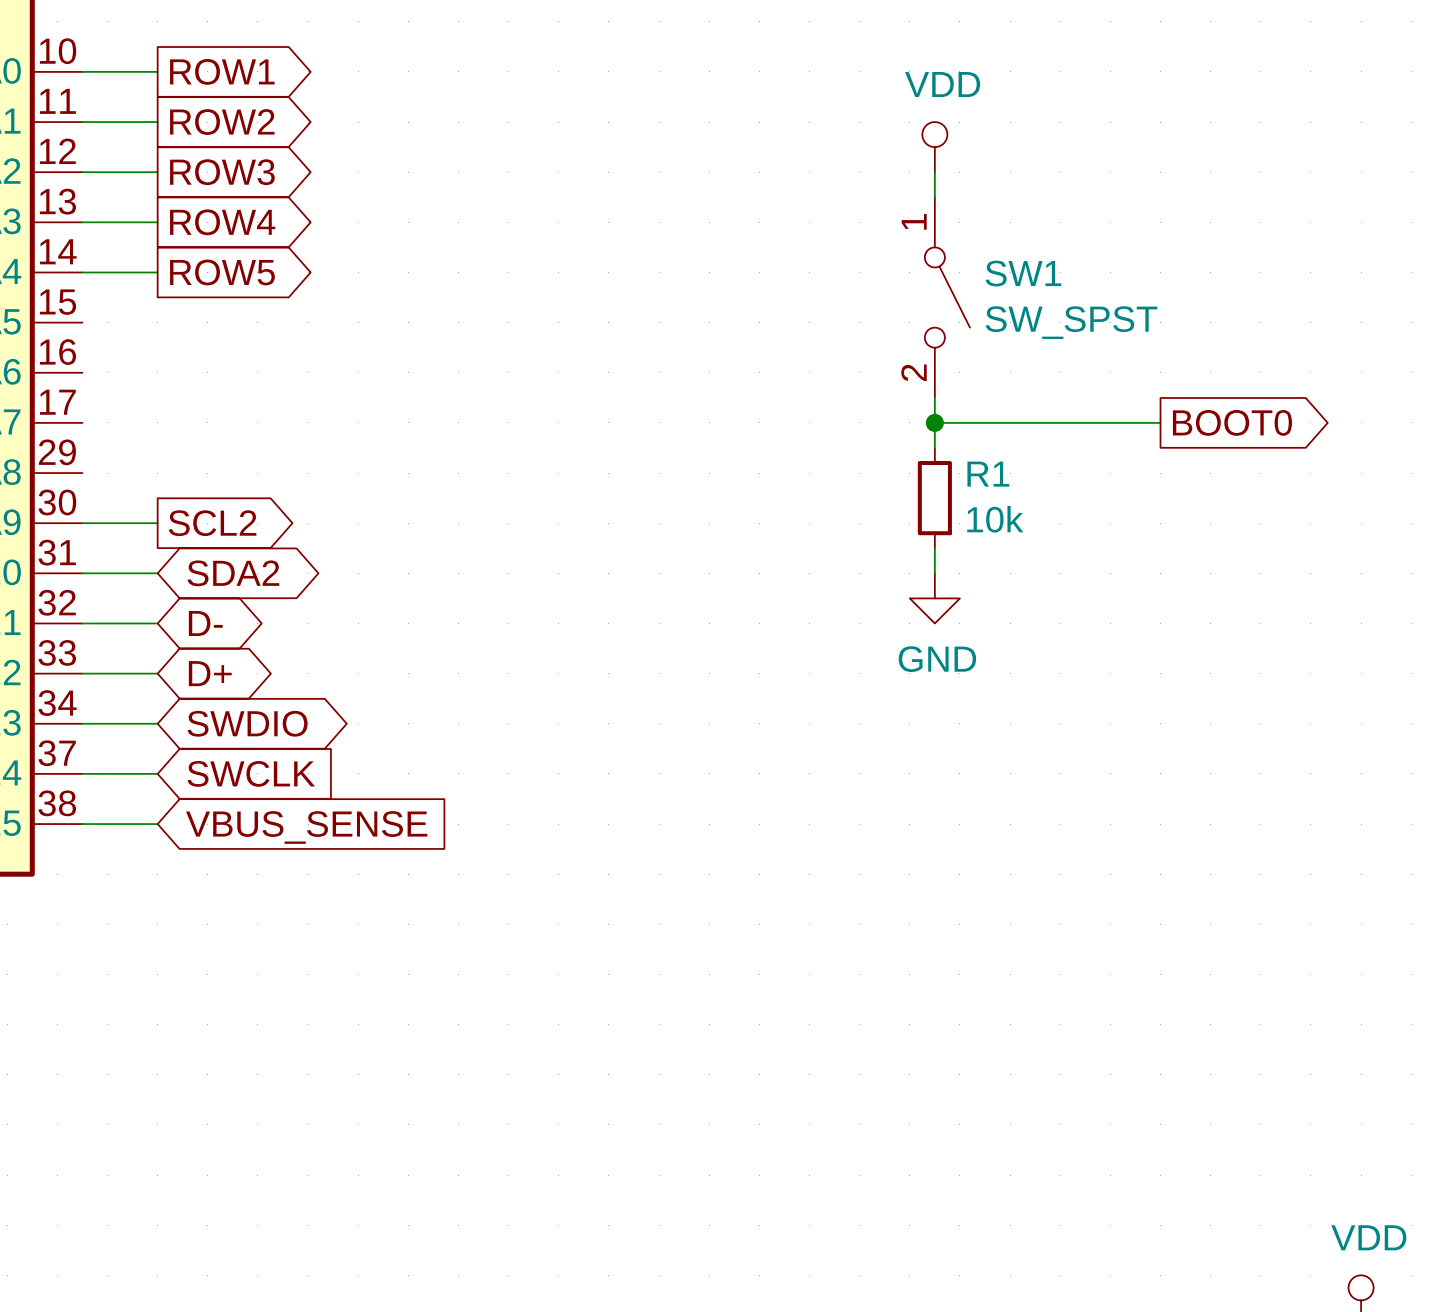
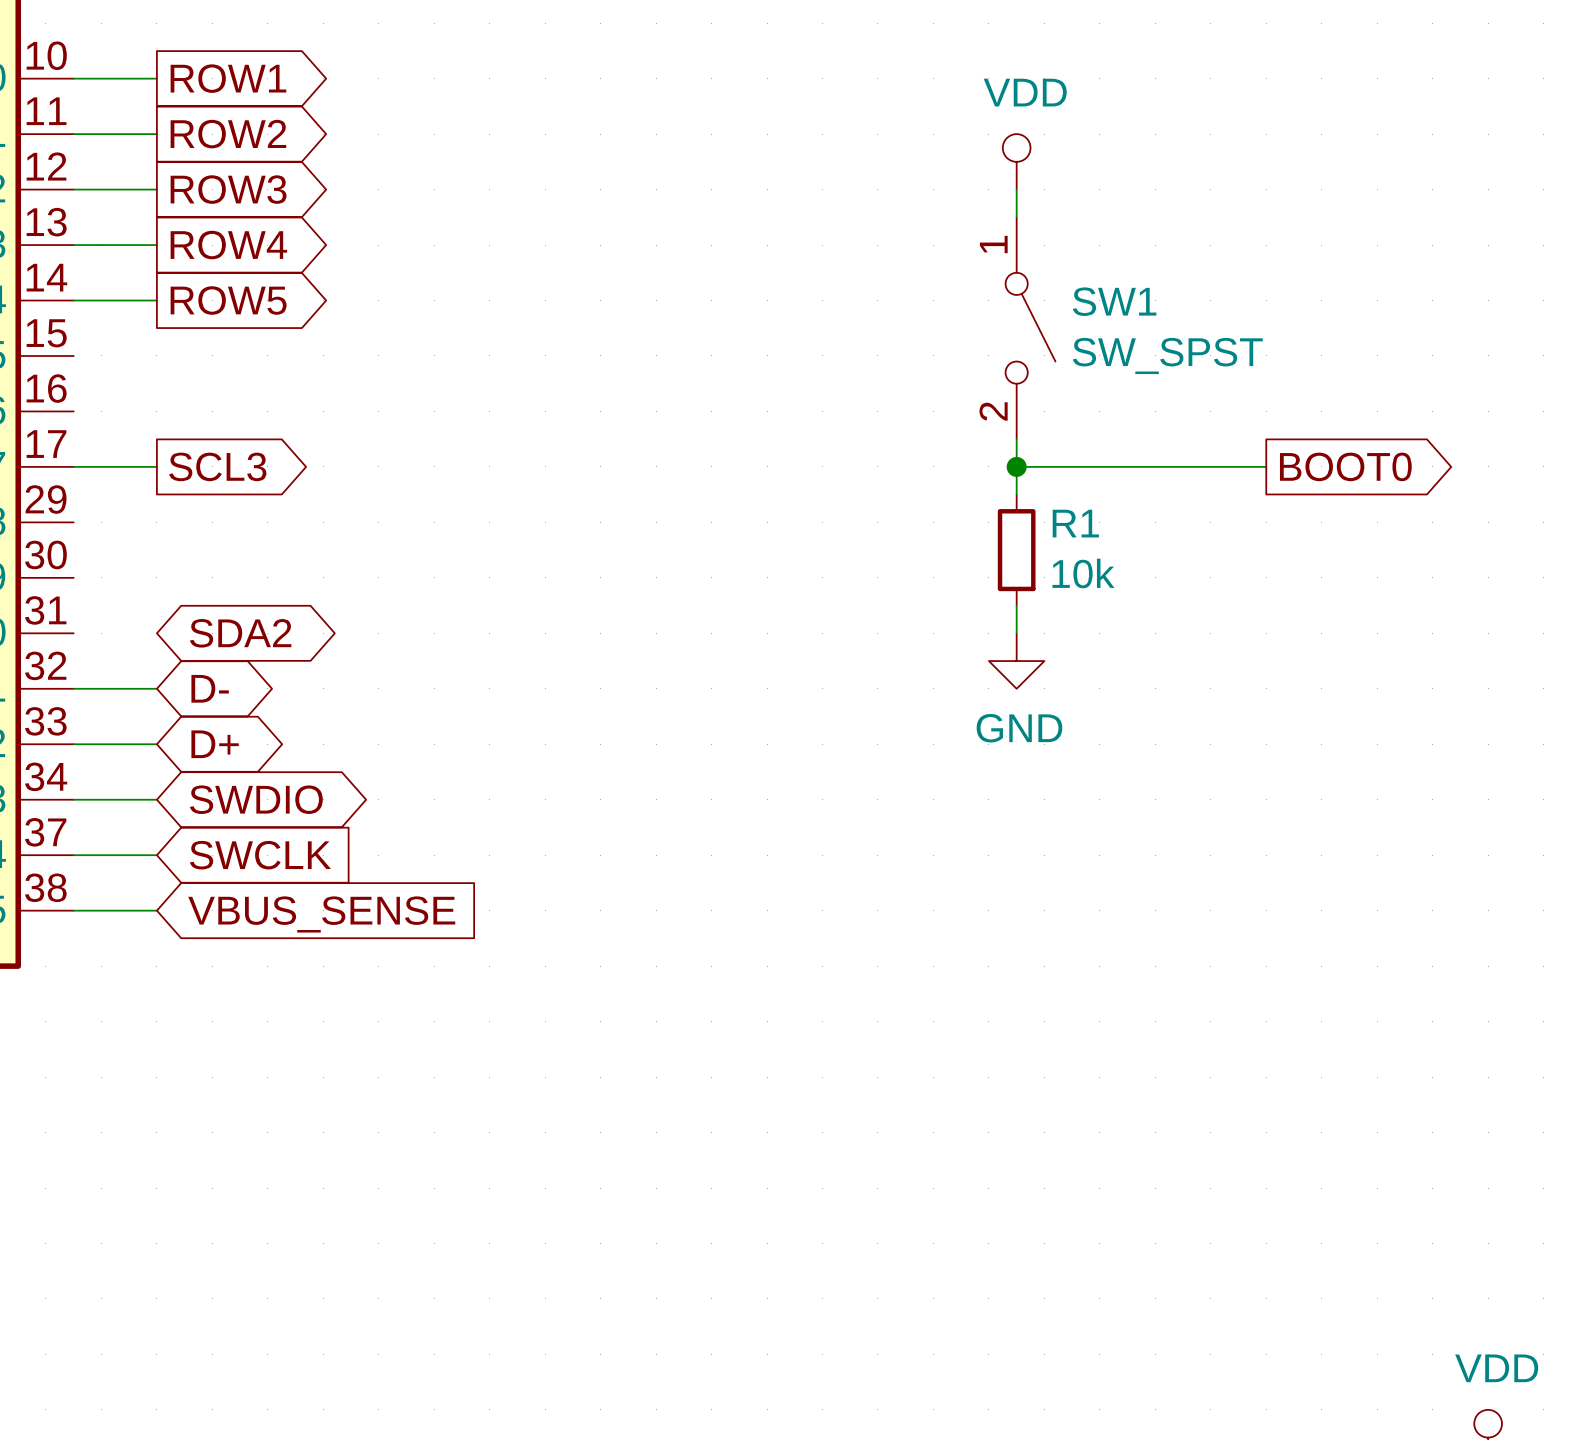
global label: none -> SCL3 (217, 466)
wire: (82, 523) (157, 523) -> (73, 466) (156, 466)
global label: SCL2 (212, 523) -> none
wire: (82, 573) (157, 573) -> none

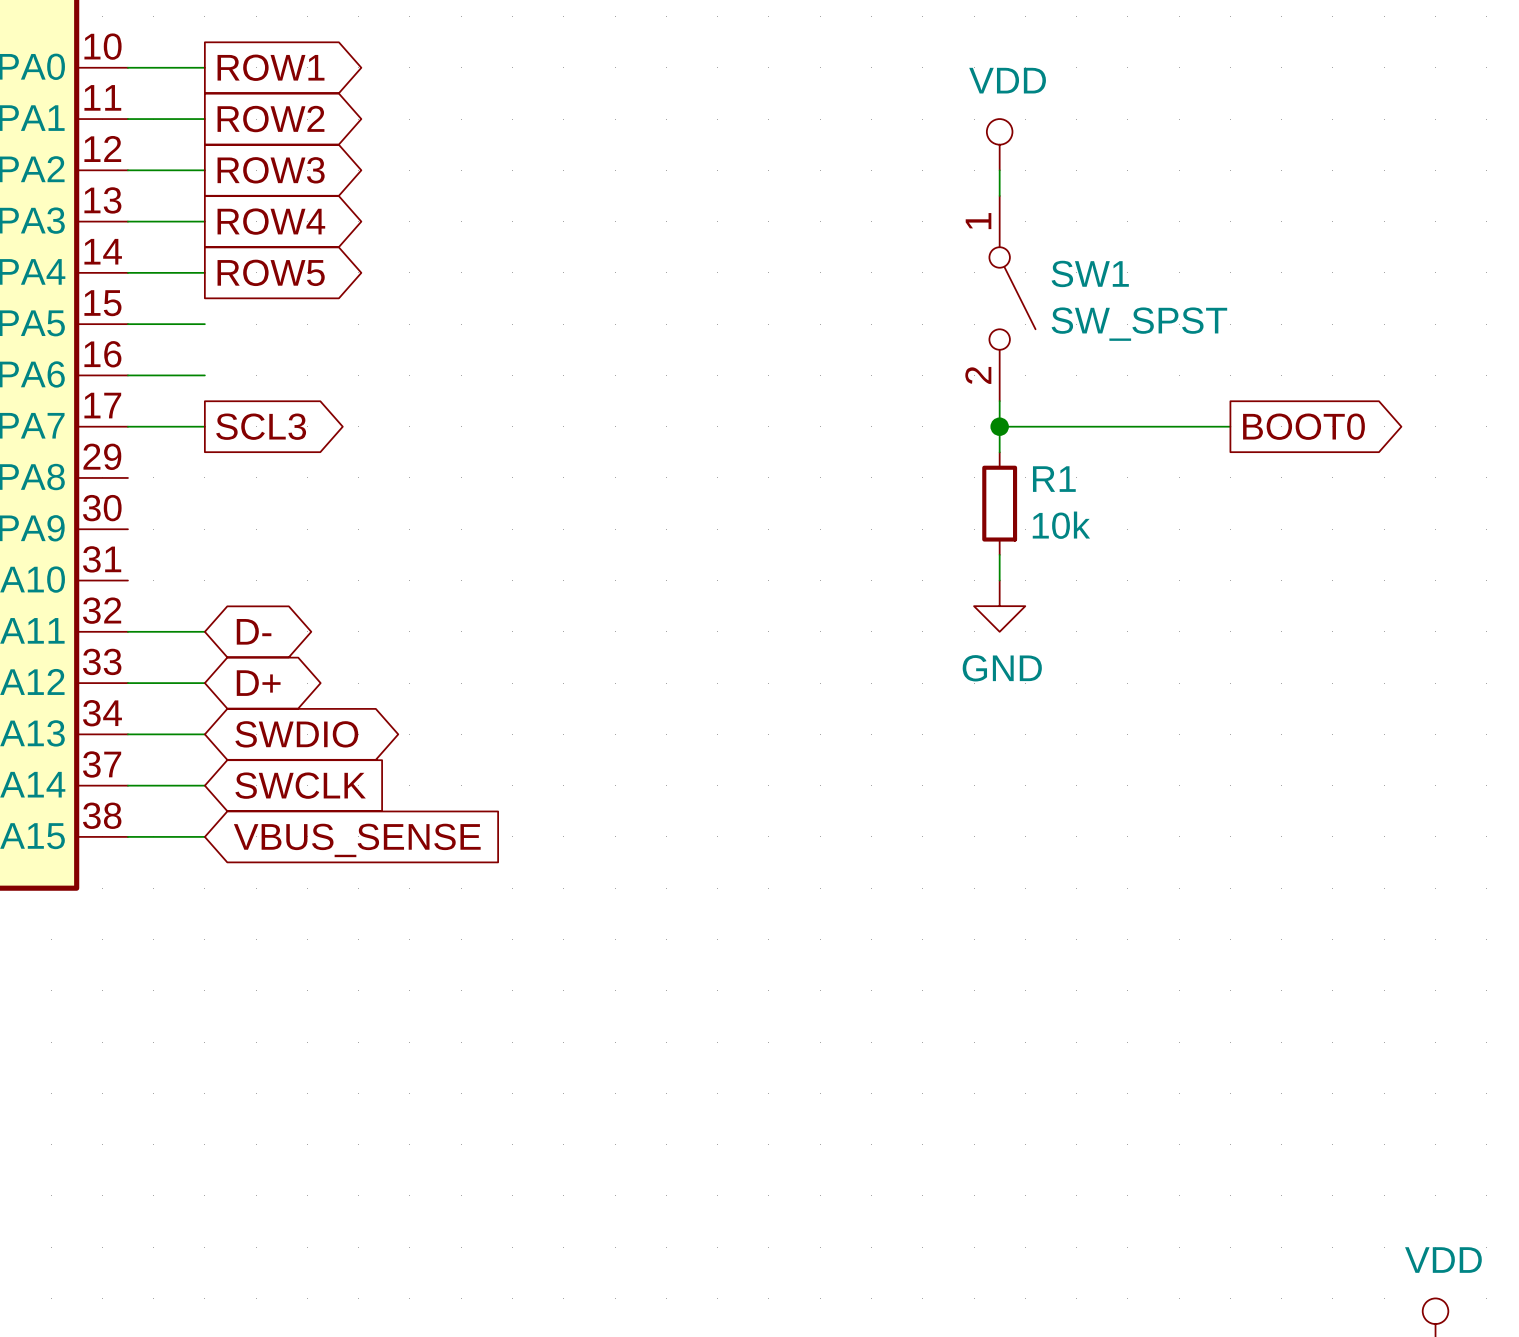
wire: none -> (127, 324) (204, 324)
wire: none -> (127, 375) (204, 375)
global label: SDA2 (240, 633) -> none

